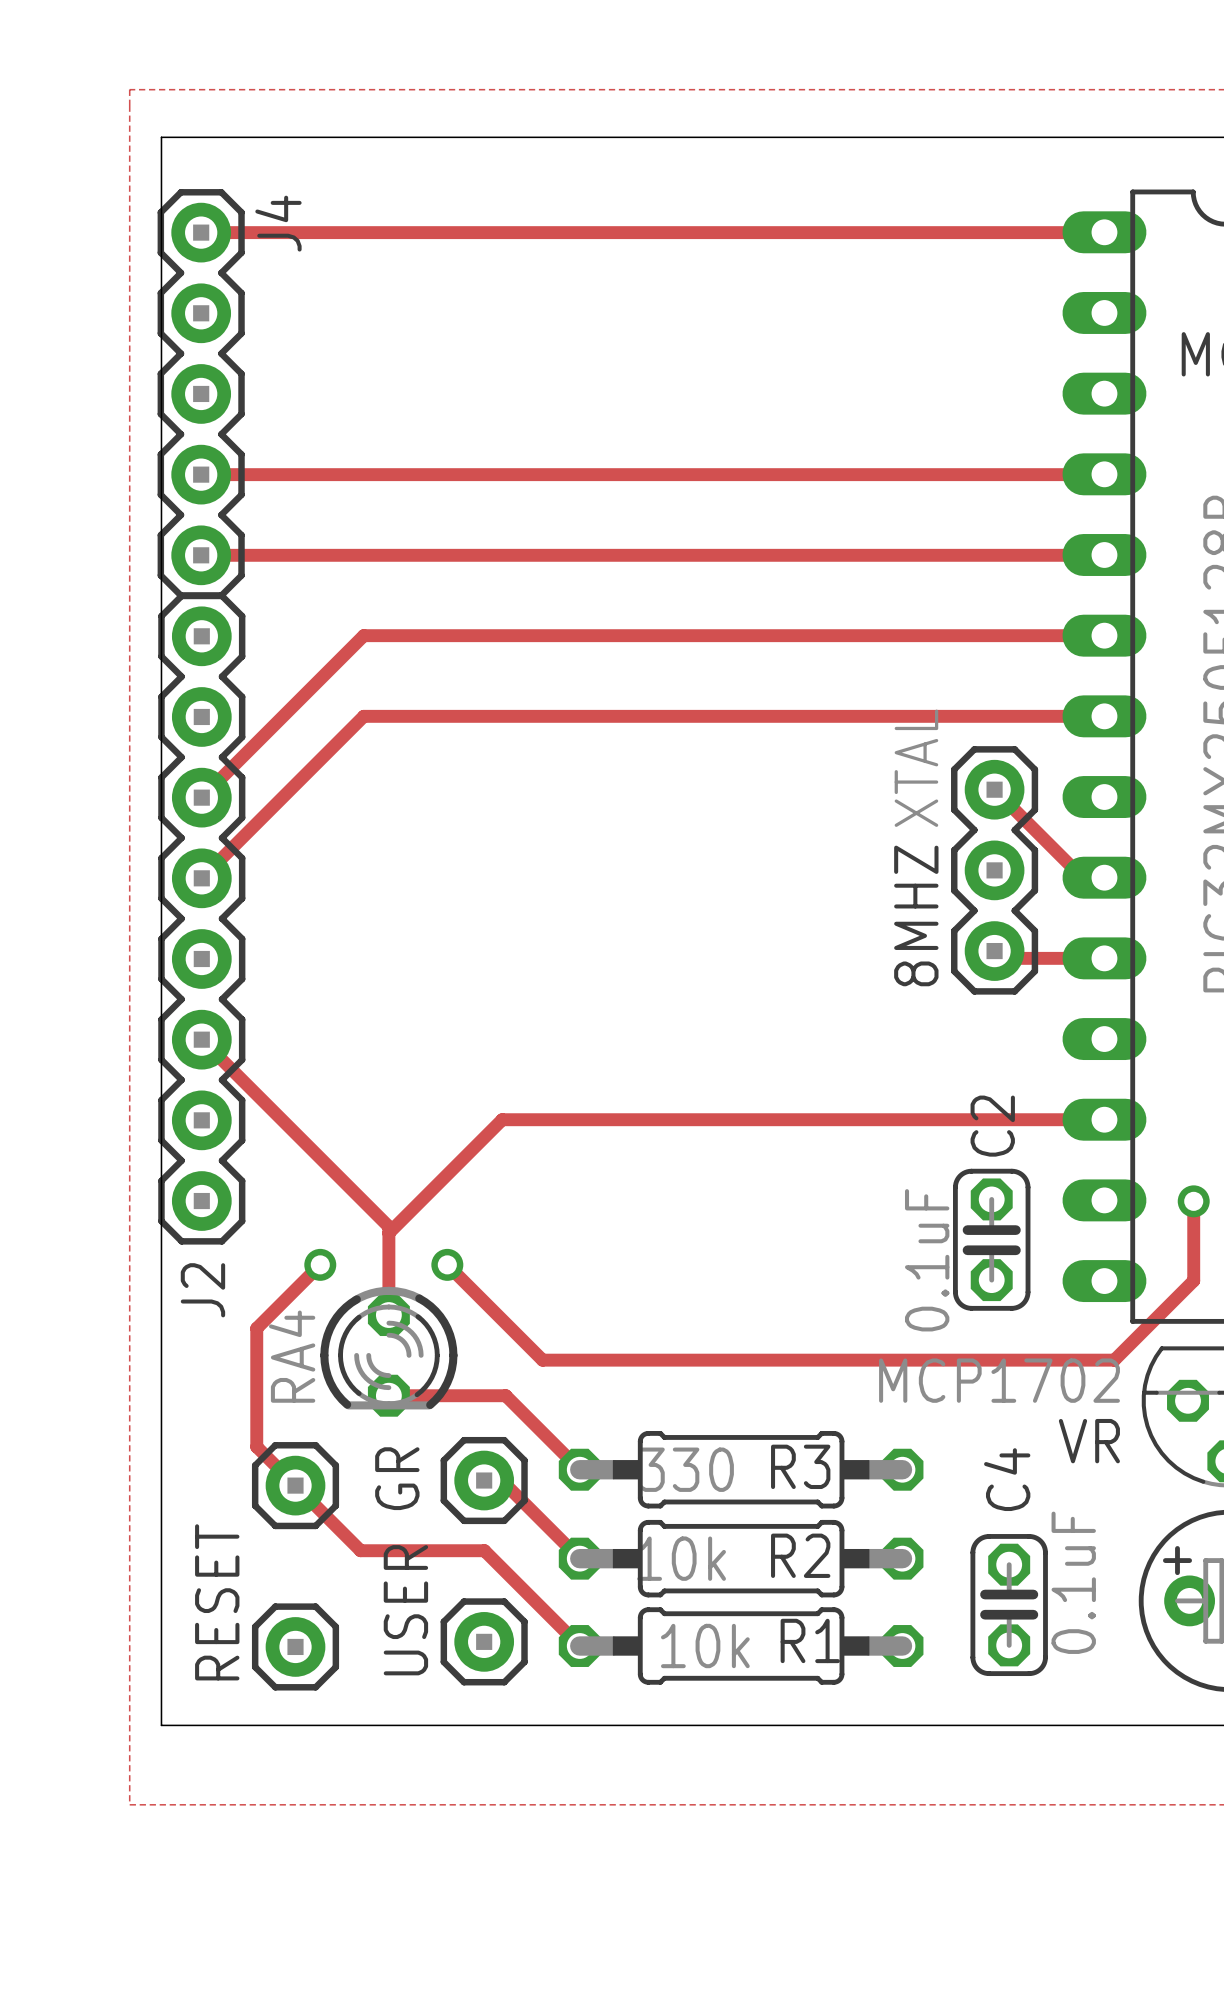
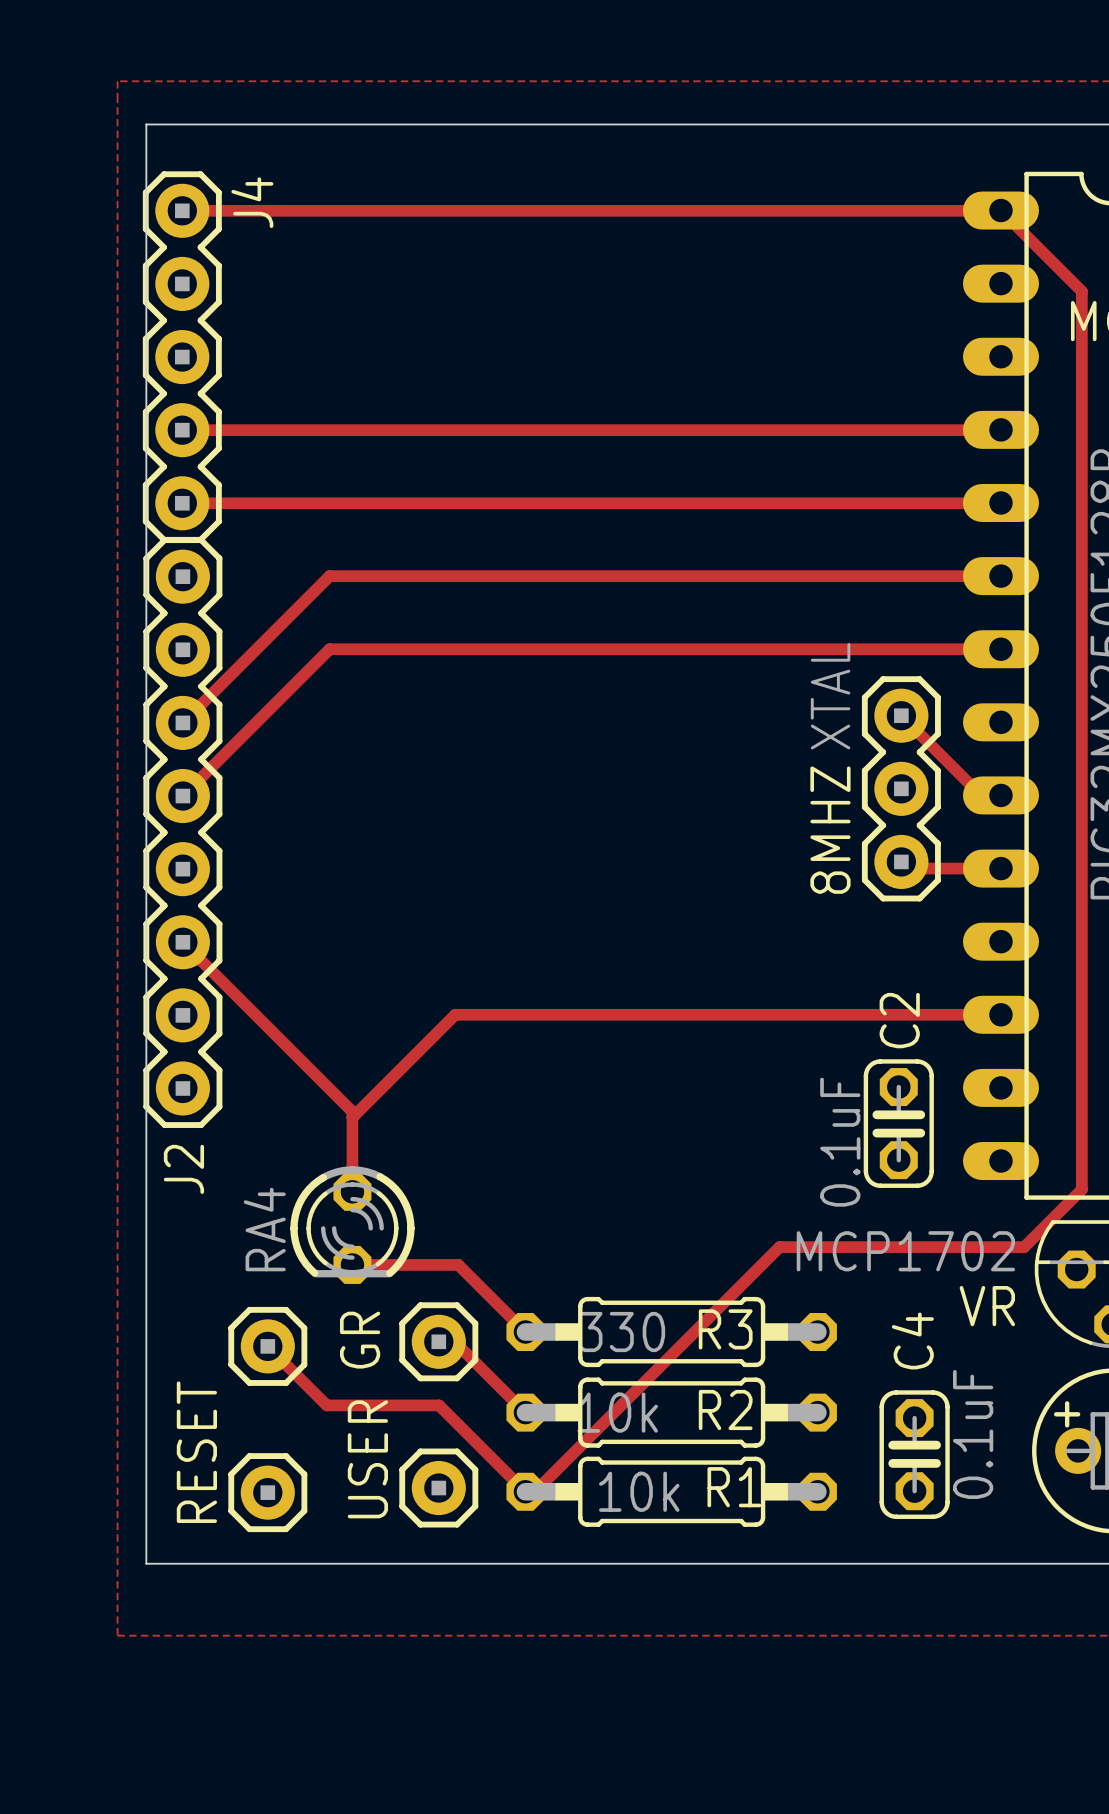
track: none -> (1000, 210) (1081, 291) (1081, 1088)
via: (1193, 1201) -> none
track: (320, 1264) (256, 1328) (256, 1446) (295, 1485) -> none
via: (320, 1264) -> none
track: (447, 1264) (542, 1360) (1114, 1360) (1193, 1280) -> (525, 1491) (534, 1491) (779, 1247) (1024, 1247) (1081, 1189) (1081, 1160)
via: (447, 1264) -> none

